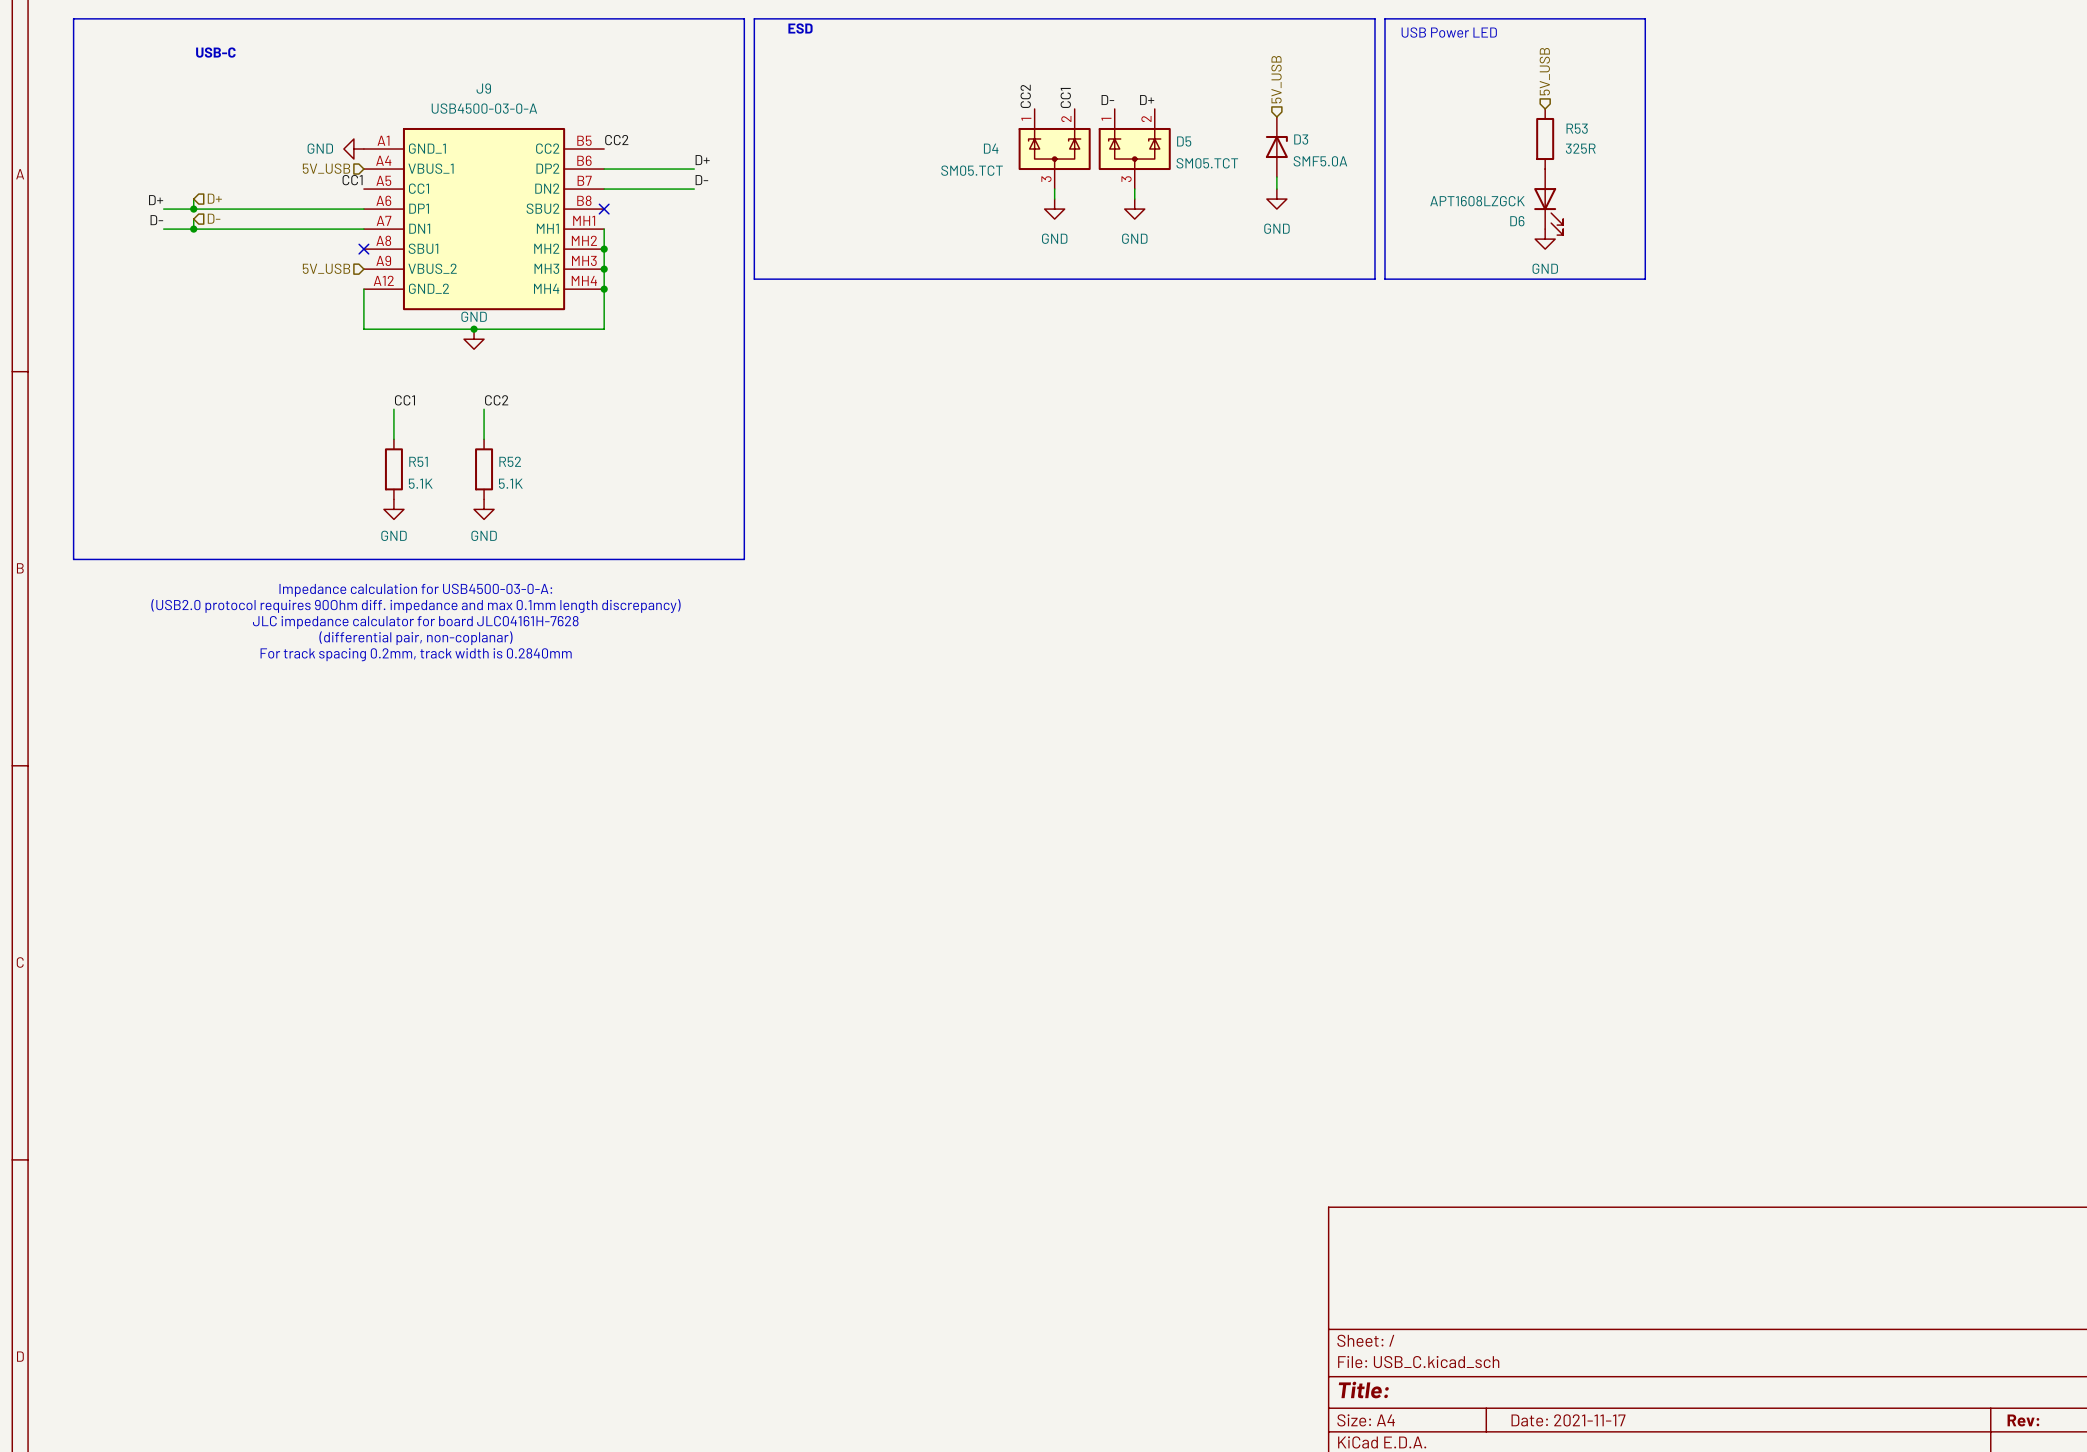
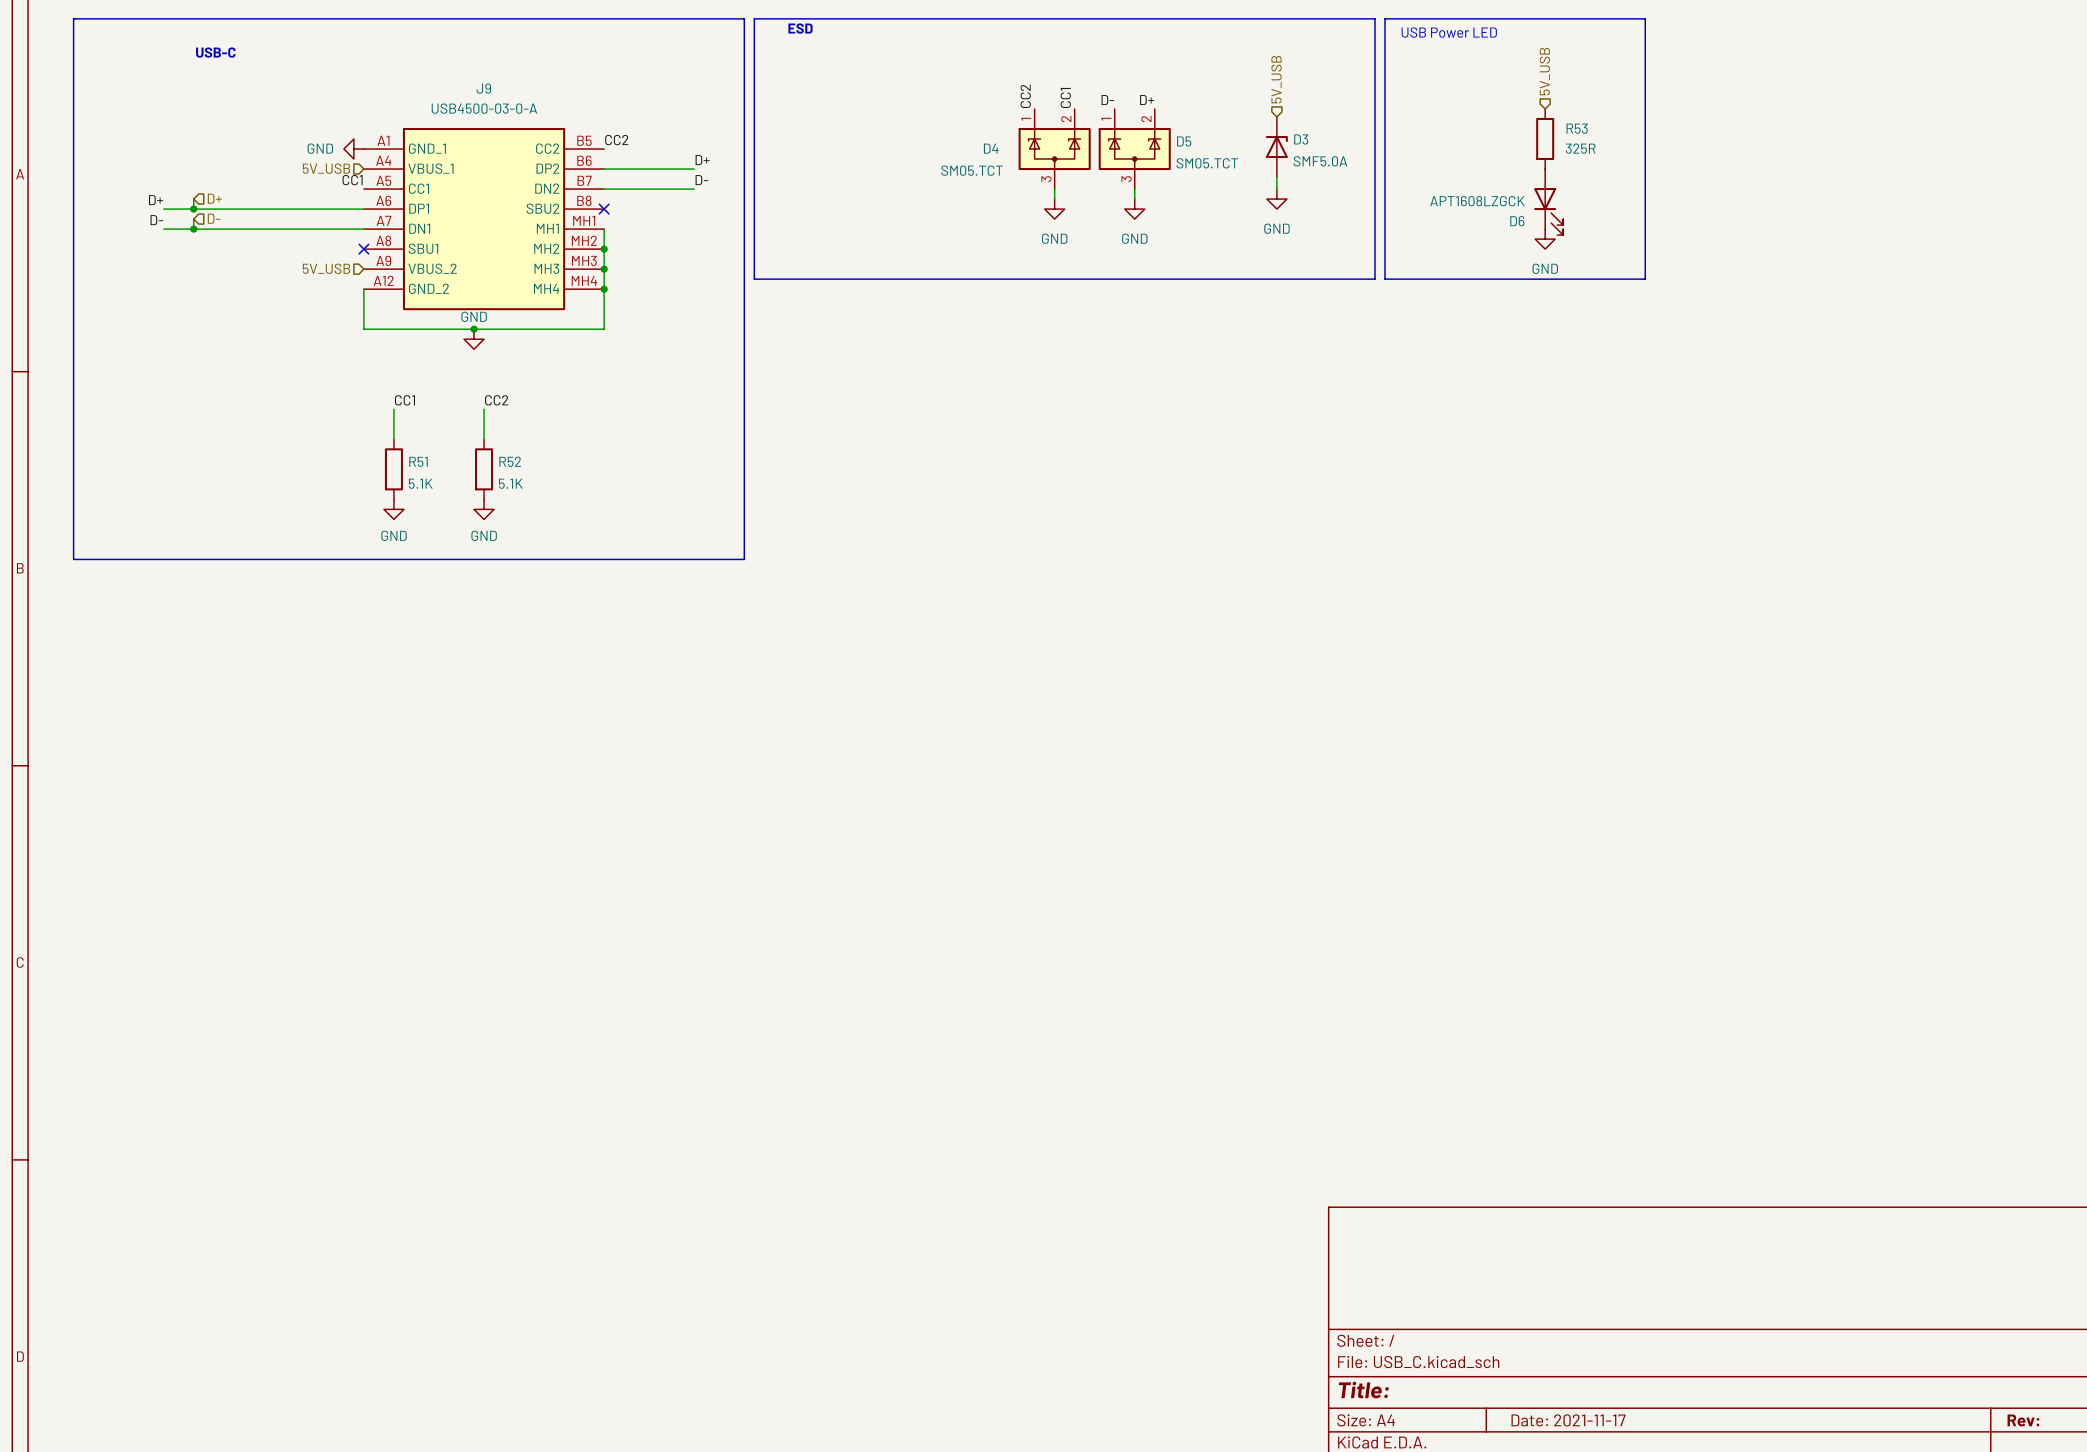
text: Impedance calculation for USB4500-03-0-A: (415, 590) -> none
text: (USB2.0 protocol requires 90Ohm diff. impedance and max 0.1mm length discrepancy) (415, 606) -> none
text: JLC impedance calculator for board JLC04161H-7628 (415, 622) -> none
text: (differential pair, non-coplanar) (415, 638) -> none
text: For track spacing 0.2mm, track width is 0.2840mm (416, 654) -> none

